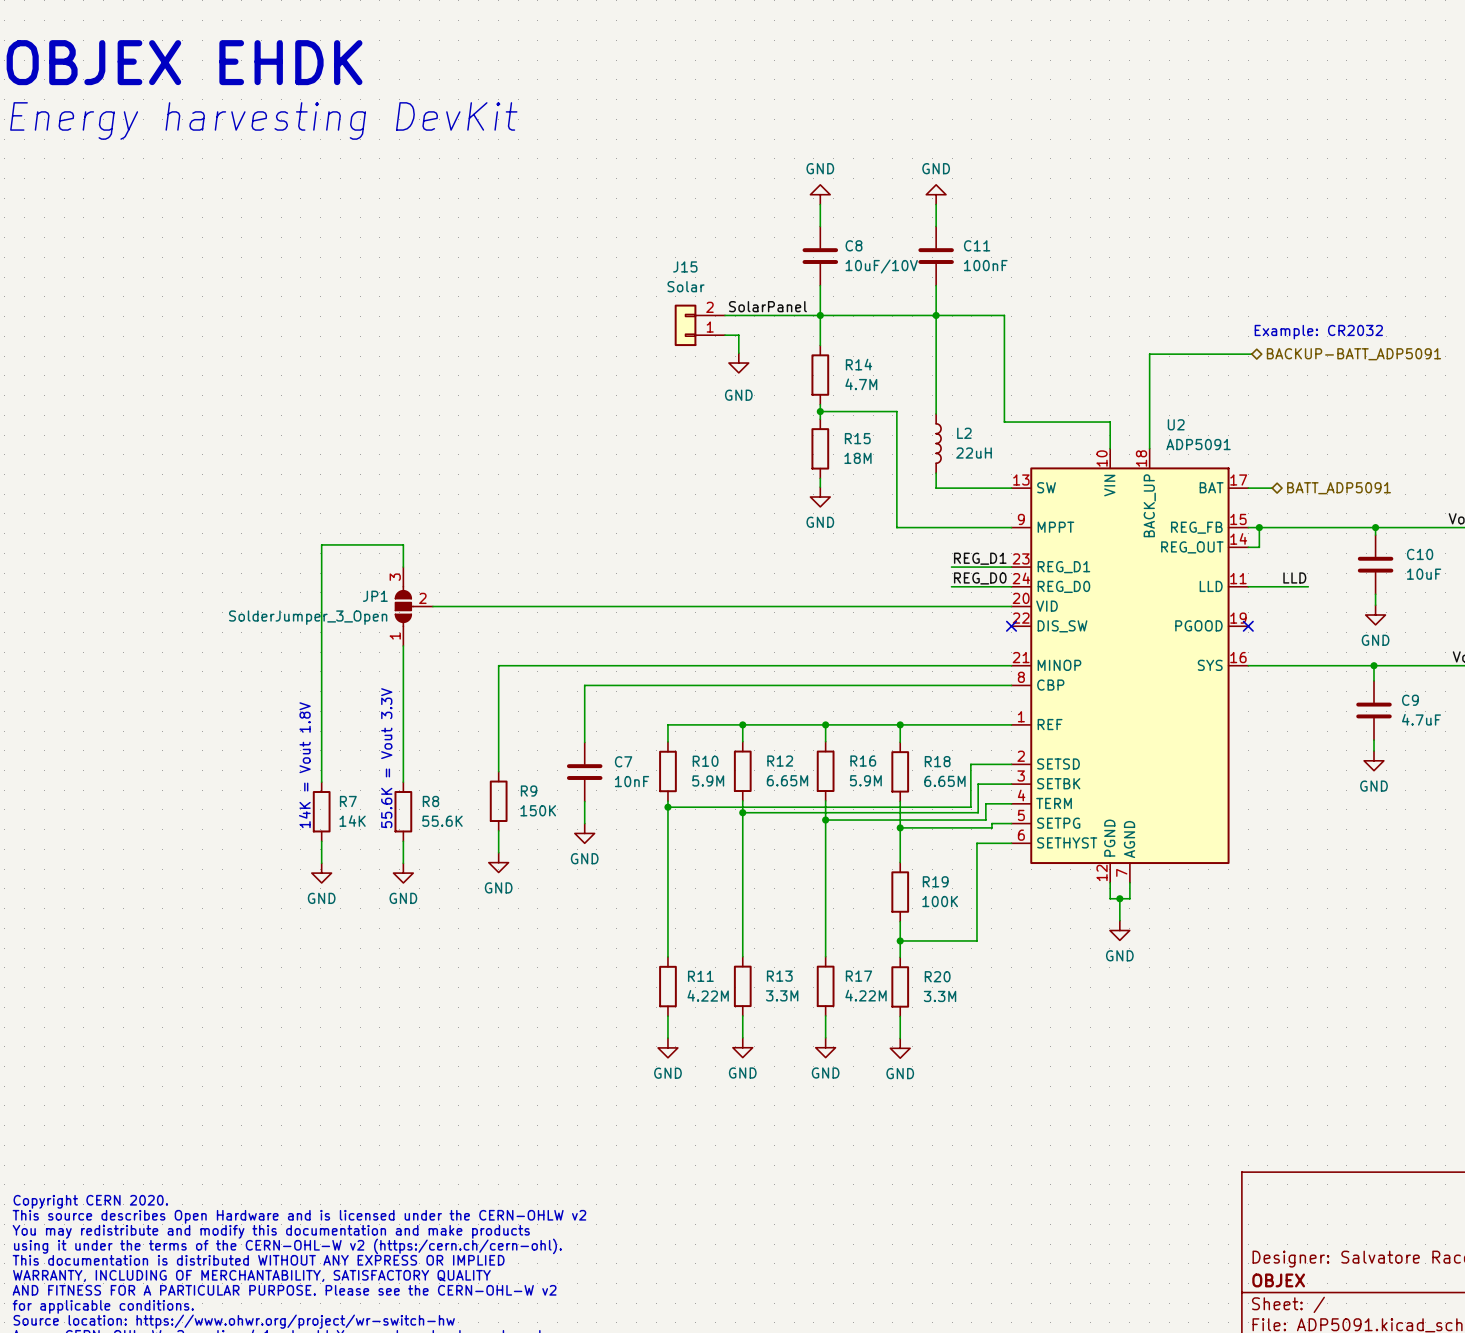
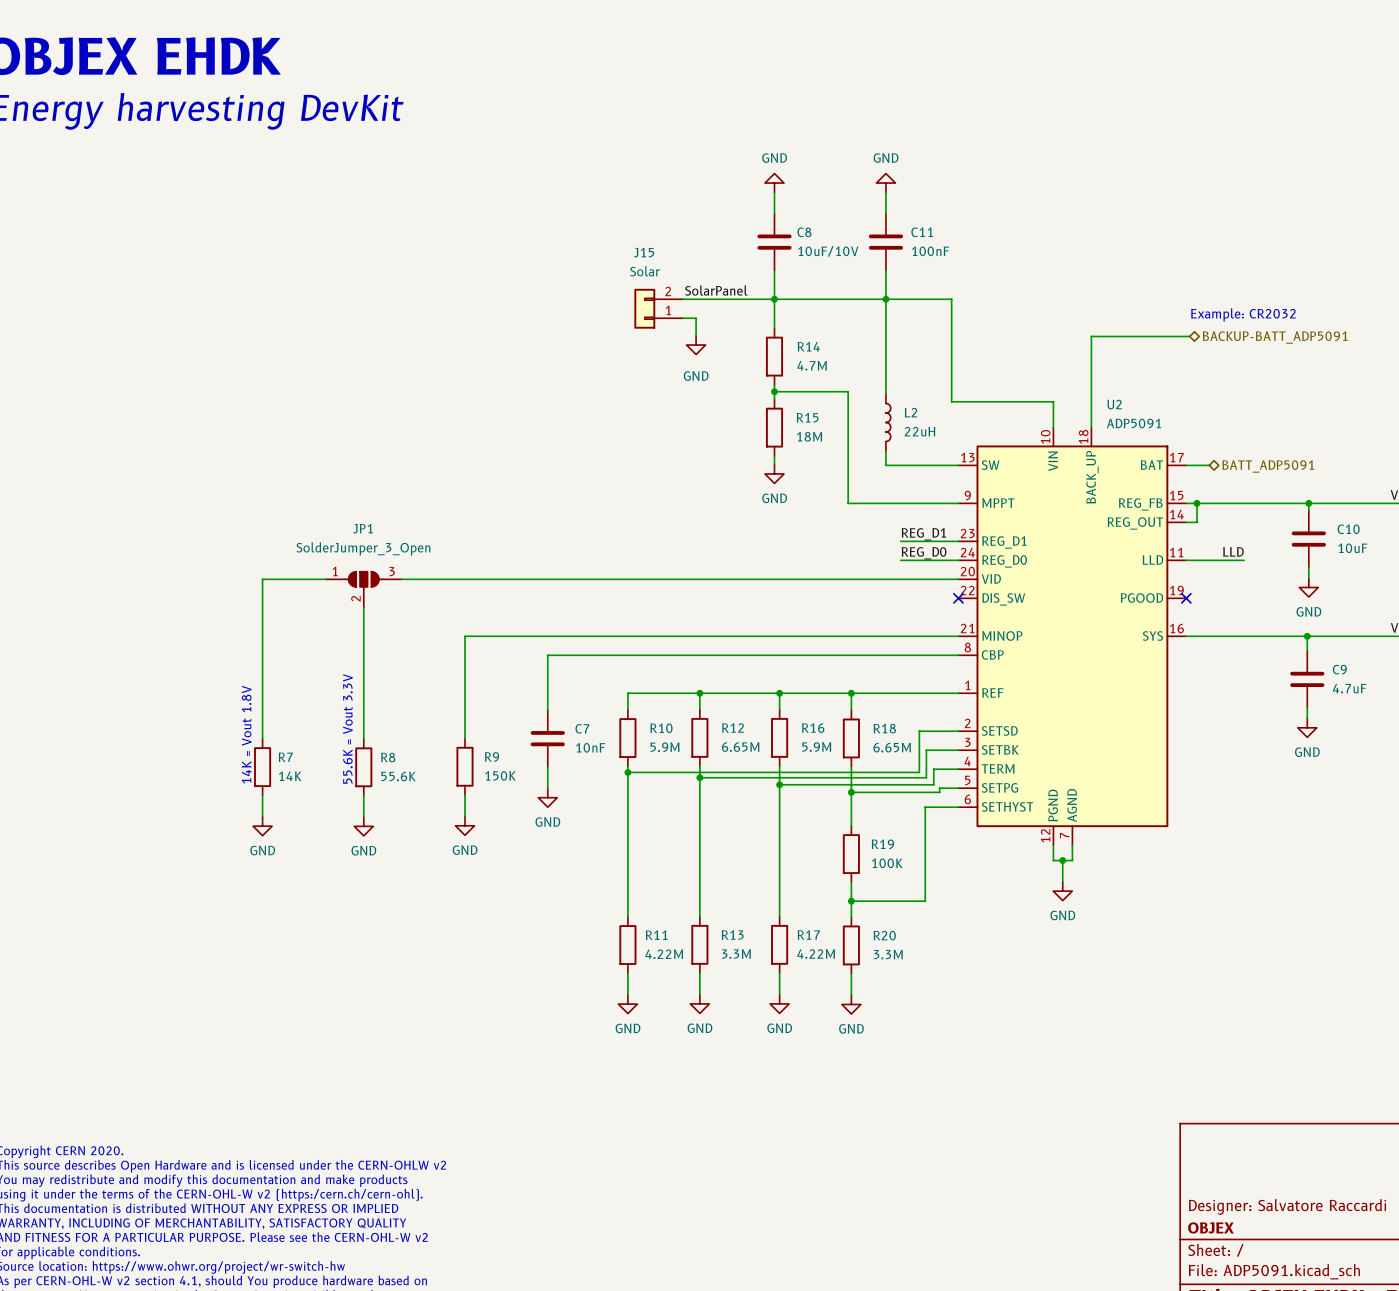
wire: (403, 567) (403, 544) (321, 544) (321, 782) -> none
JP1 name position: JP1 (375, 596) -> JP1 (363, 528)
wire: none -> (325, 579) (262, 579) (262, 738)
JP1 rotation: 0° (404, 606) -> 90° clockwise (363, 580)
JP1 value position: SolderJumper_3_Open (308, 617) -> SolderJumper_3_Open (363, 548)
wire: (403, 645) (403, 782) -> (363, 607) (363, 738)
text position: 55.6K = Vout 3.3V (386, 758) -> 55.6K = Vout 3.3V (347, 728)
text position: 14K = Vout 1.8V (304, 765) -> 14K = Vout 1.8V (246, 734)
R7 position: (321, 811) -> (262, 767)
R8 position: (403, 811) -> (363, 767)
wire: (321, 841) (321, 863) -> (262, 795) (262, 816)
wire: (403, 841) (403, 863) -> (363, 795) (363, 816)
power symbol position: GND (321, 873) -> GND (262, 826)
power symbol position: GND (403, 873) -> GND (363, 826)

